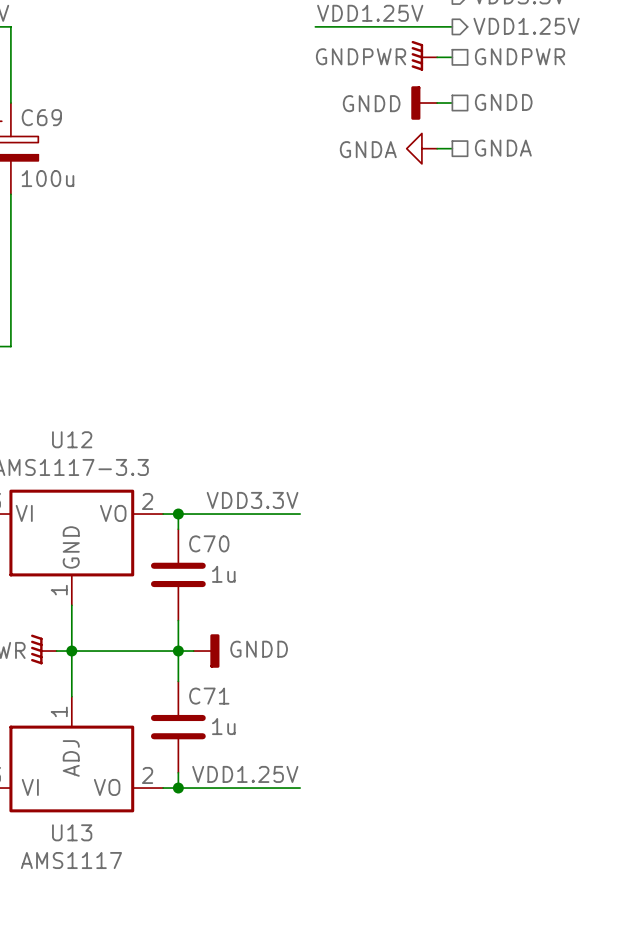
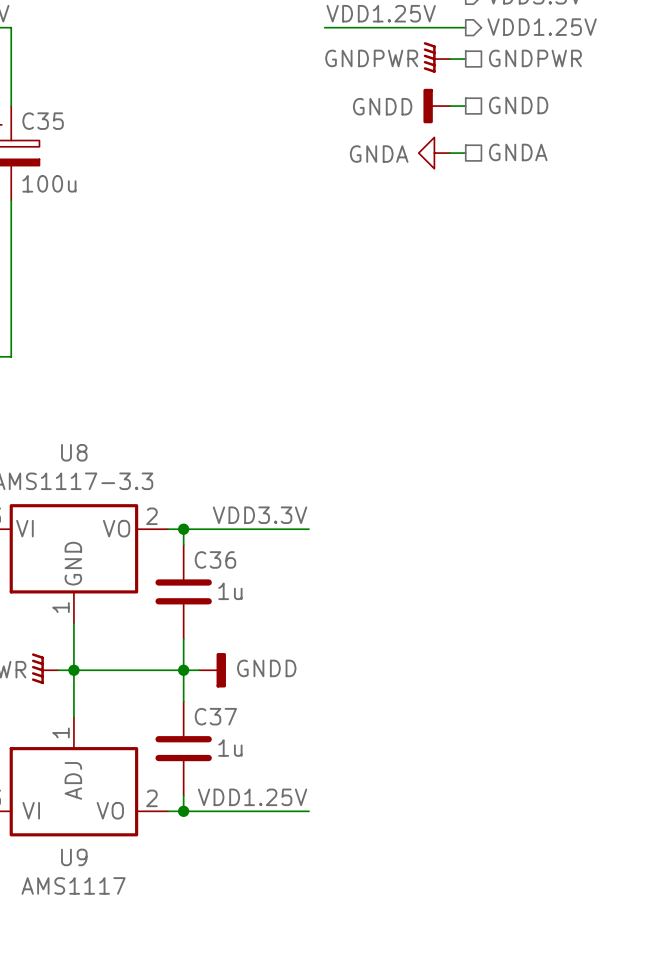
C69 name: C69 (41, 117) -> C35 (43, 121)
U12 name: U12 (72, 439) -> U8 (74, 452)
C70 name: C70 (209, 543) -> C36 (215, 559)
C71 name: C71 (209, 696) -> C37 (215, 716)
U13 name: U13 (72, 832) -> U9 (74, 857)

